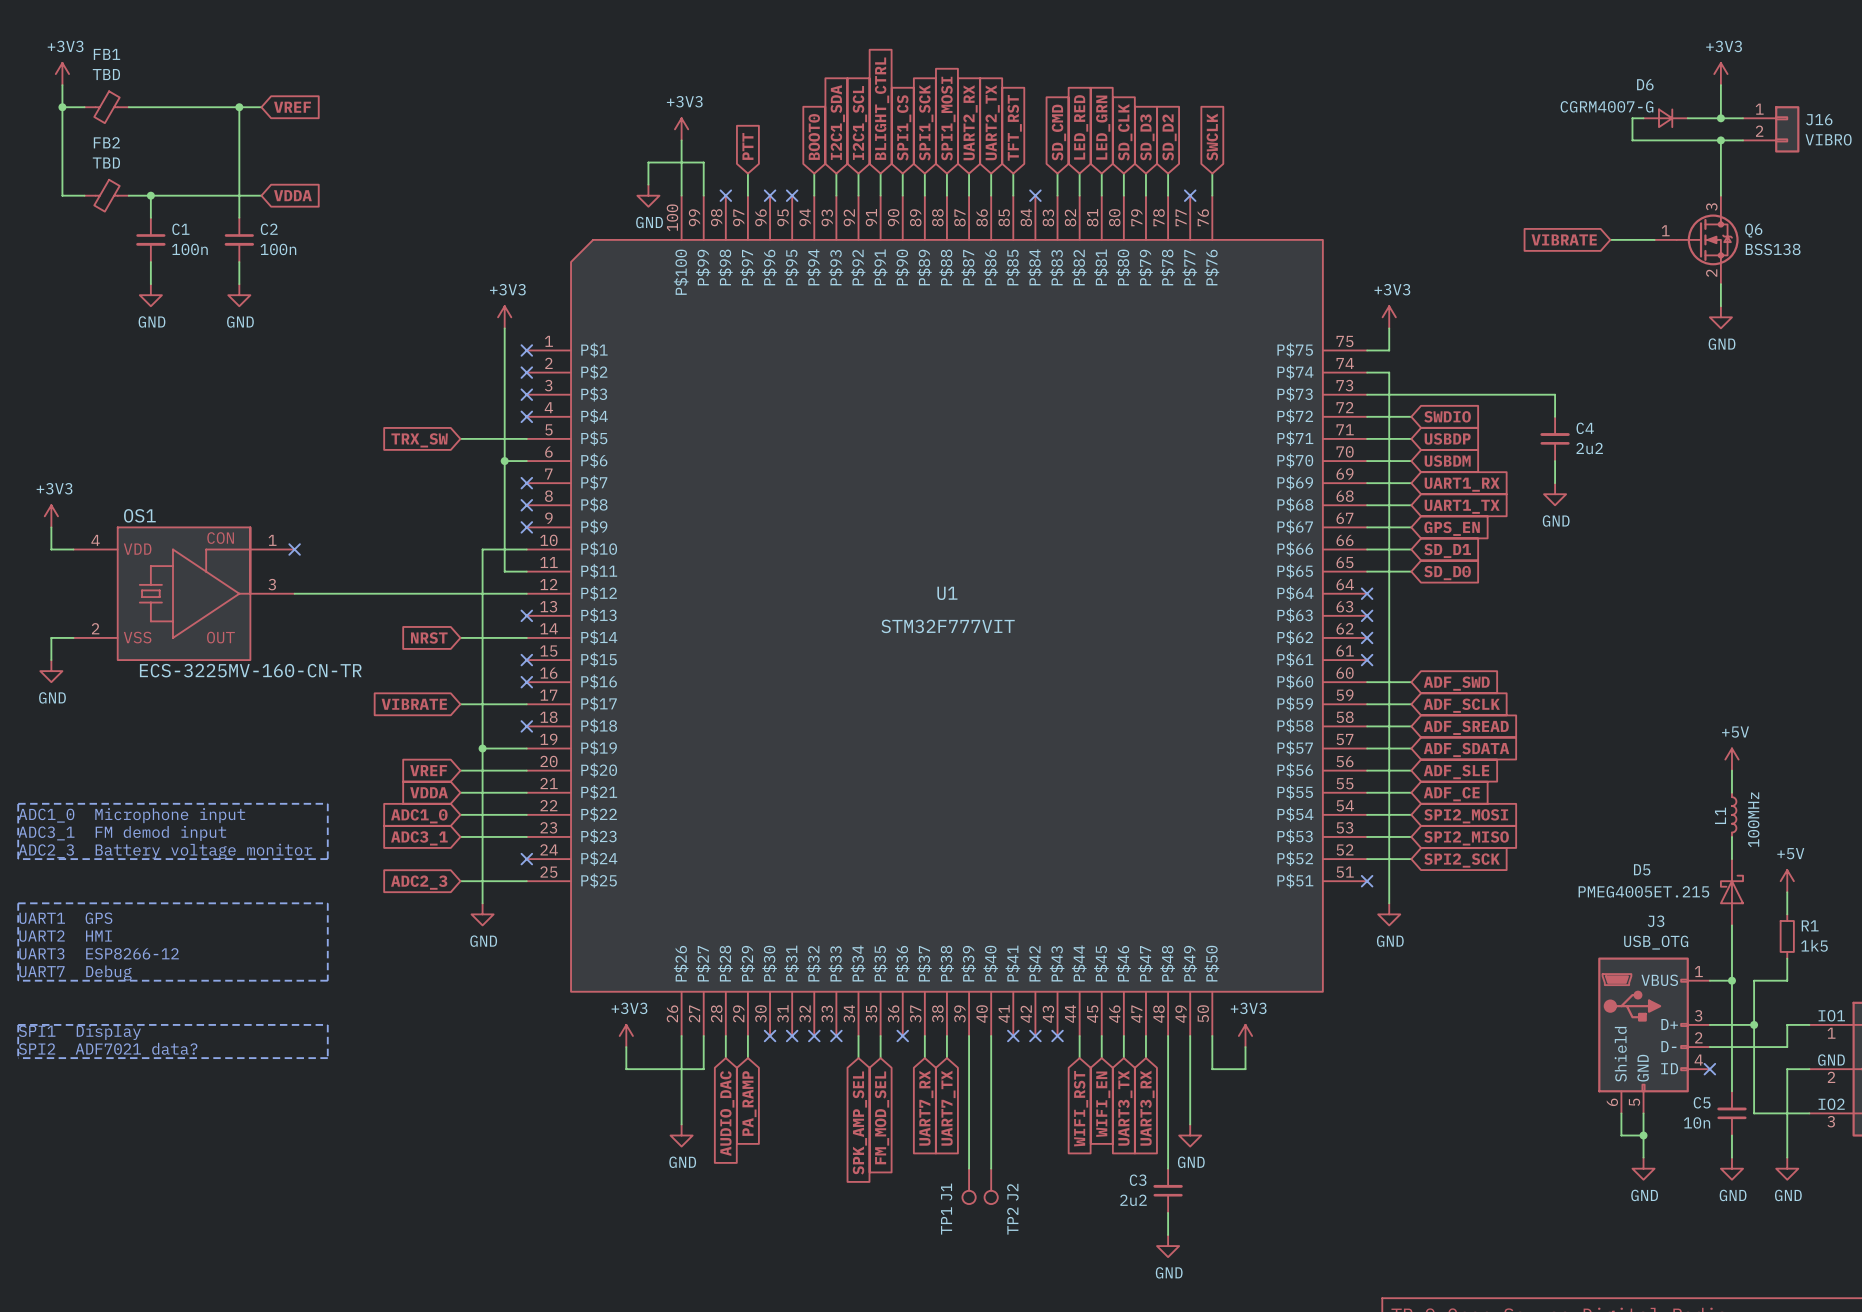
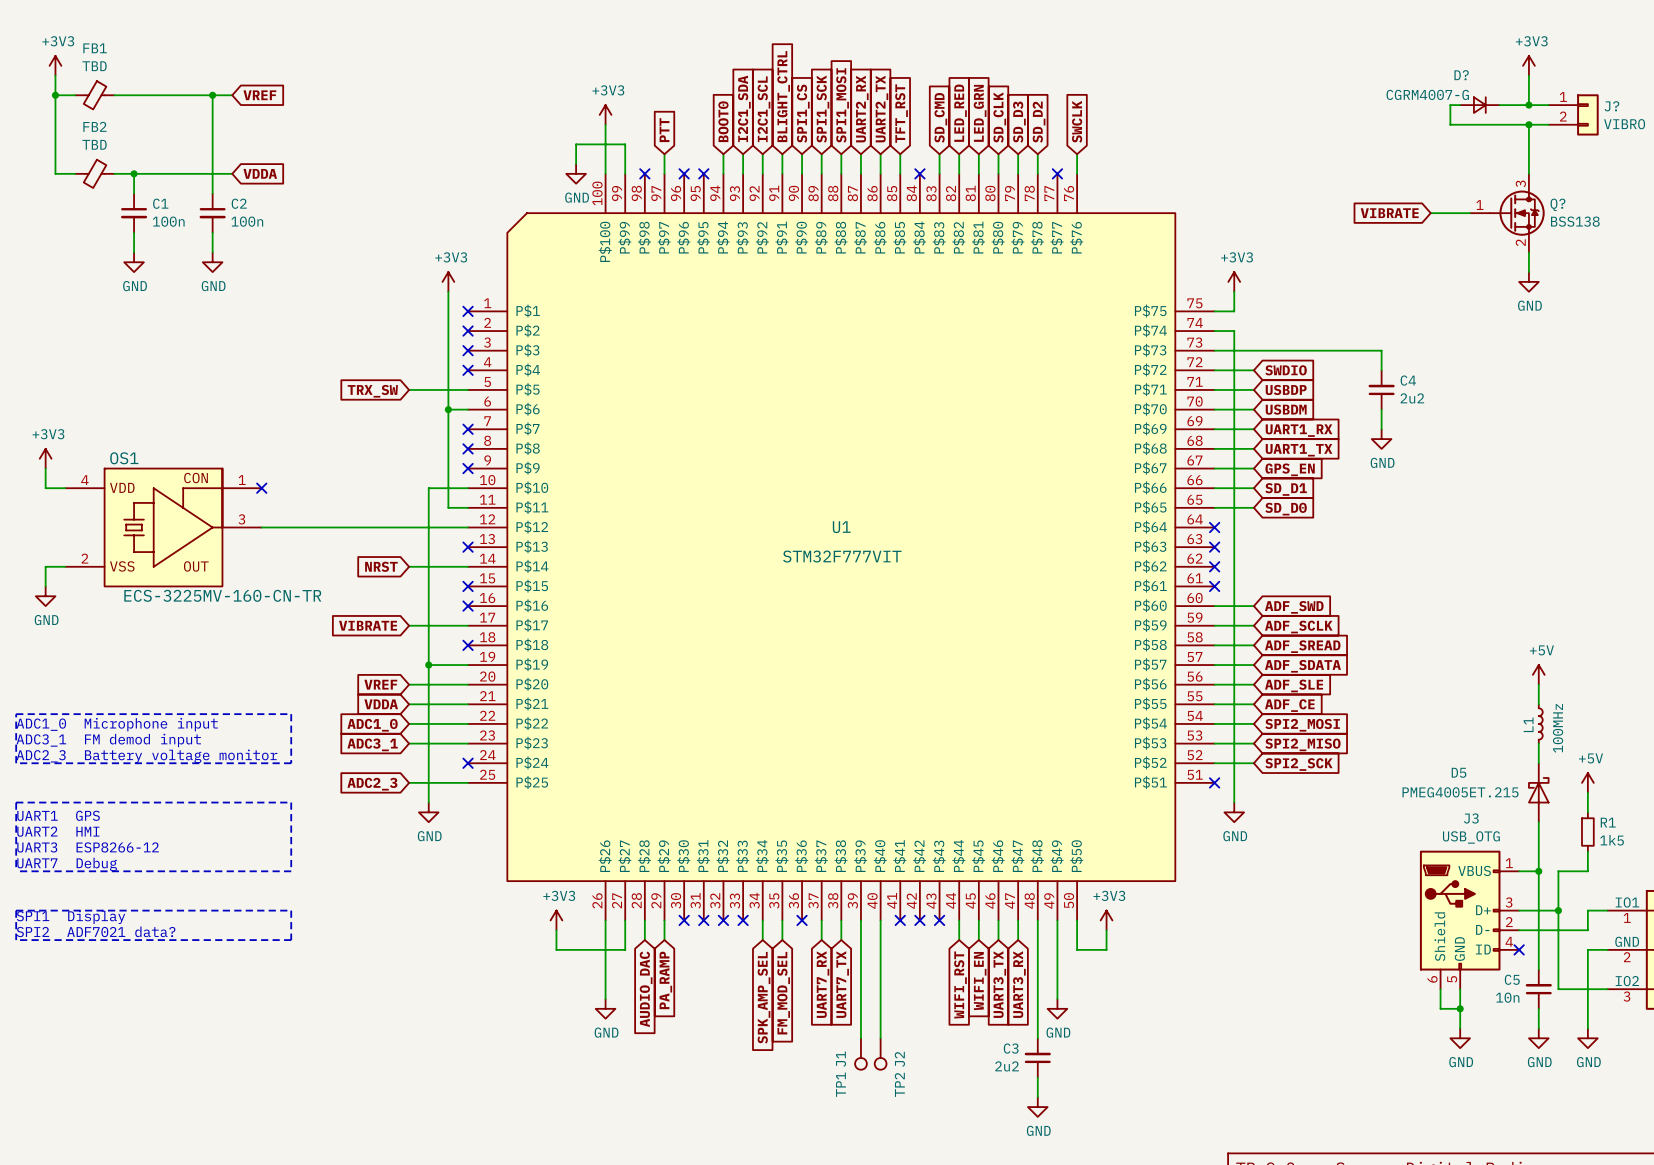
D6 name: D6 (1645, 84) -> D? (1461, 75)
J16 name: J16 (1819, 119) -> J? (1611, 106)
Q6 name: Q6 (1753, 230) -> Q? (1557, 204)

